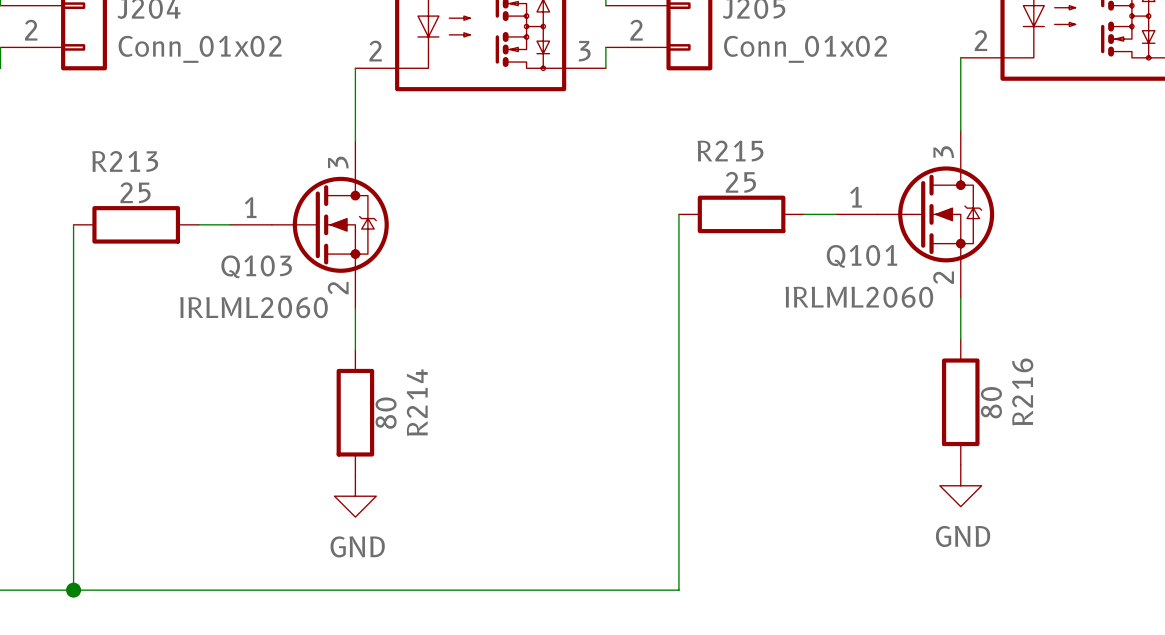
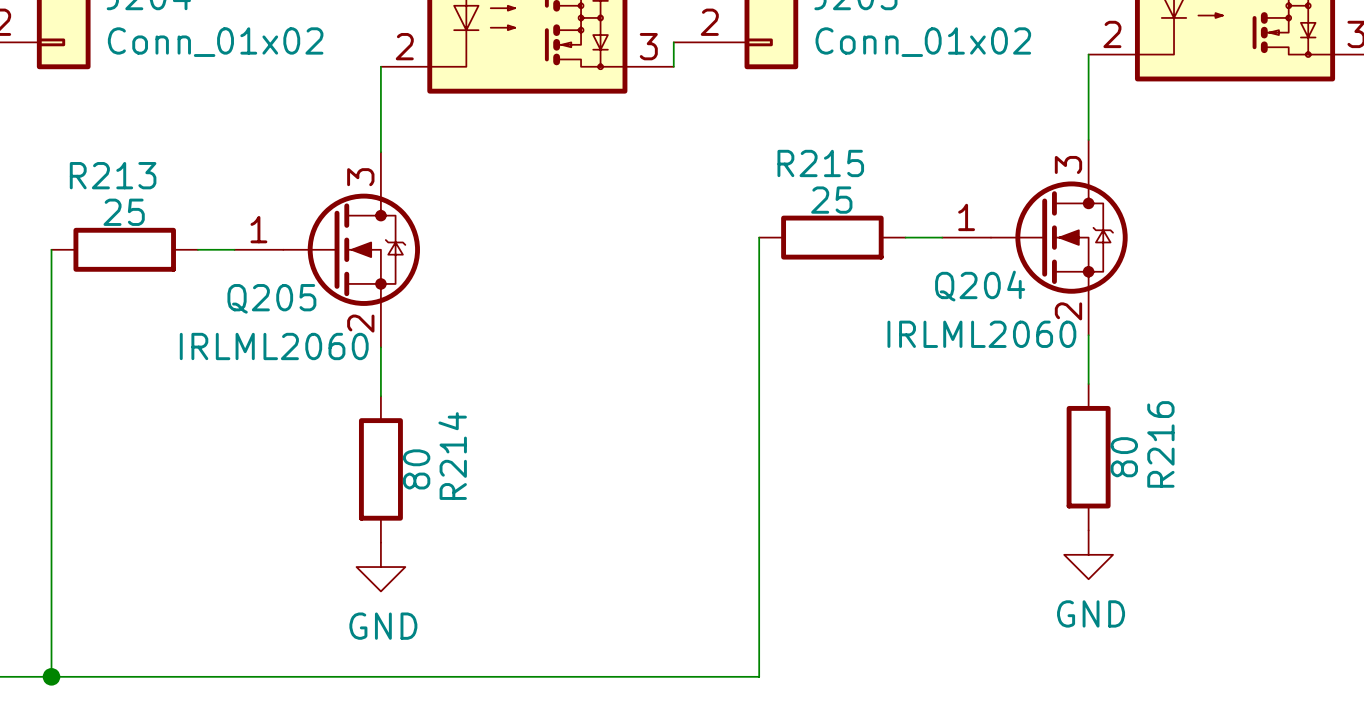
Q101 name: Q101 (861, 256) -> Q204 (980, 286)
Q103 name: Q103 (256, 266) -> Q205 (271, 298)

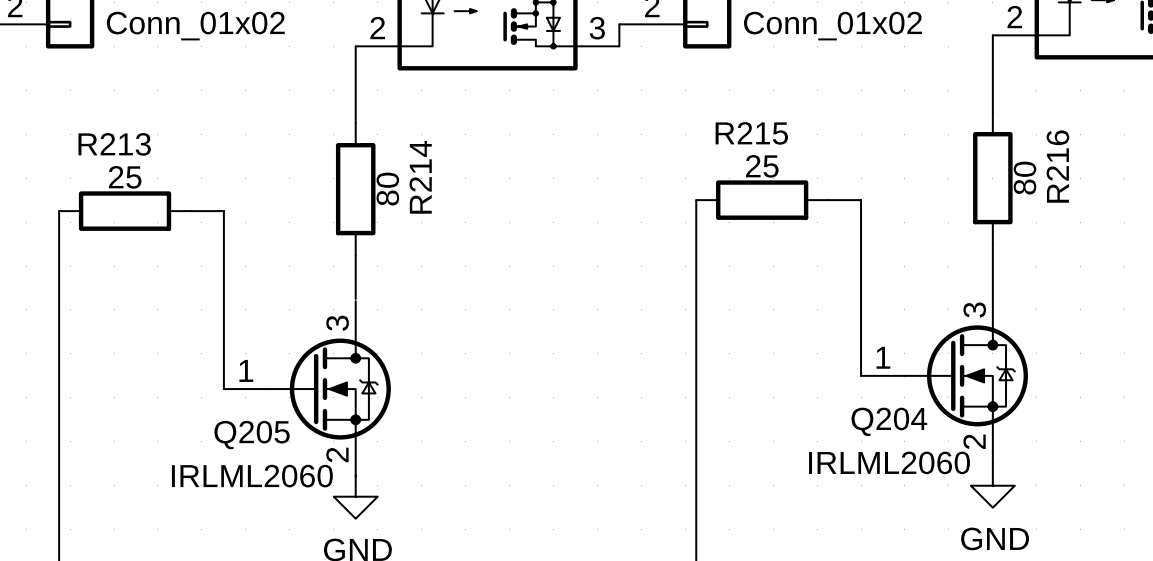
wire: none -> (861, 200) (861, 375)
Q204 position: (1034, 237) -> (944, 375)
wire: none -> (223, 211) (223, 389)
Q205 position: (327, 249) -> (307, 389)
R216 position: (1088, 457) -> (992, 178)
R214 position: (380, 469) -> (355, 189)

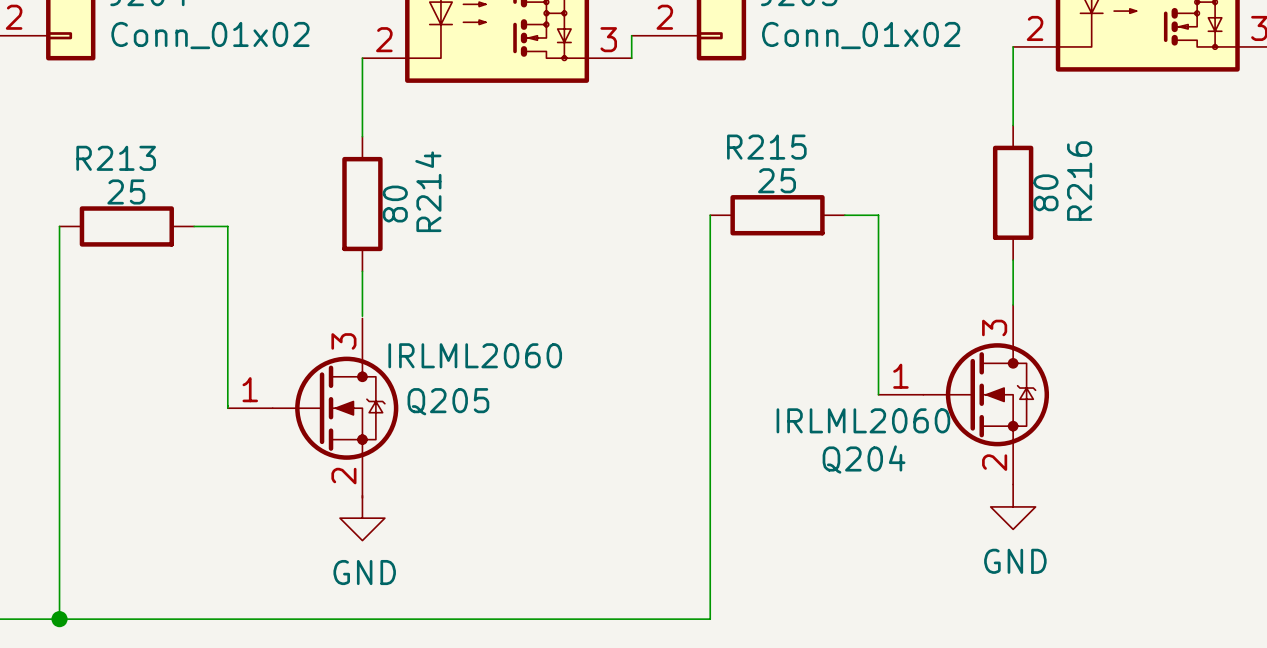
Q204 name position: Q204 (889, 421) -> Q204 (864, 459)
Q205 name position: Q205 (252, 435) -> Q205 (448, 401)
Q204 value position: IRLML2060 (889, 462) -> IRLML2060 (863, 420)
Q205 value position: IRLML2060 (252, 476) -> IRLML2060 (475, 355)

